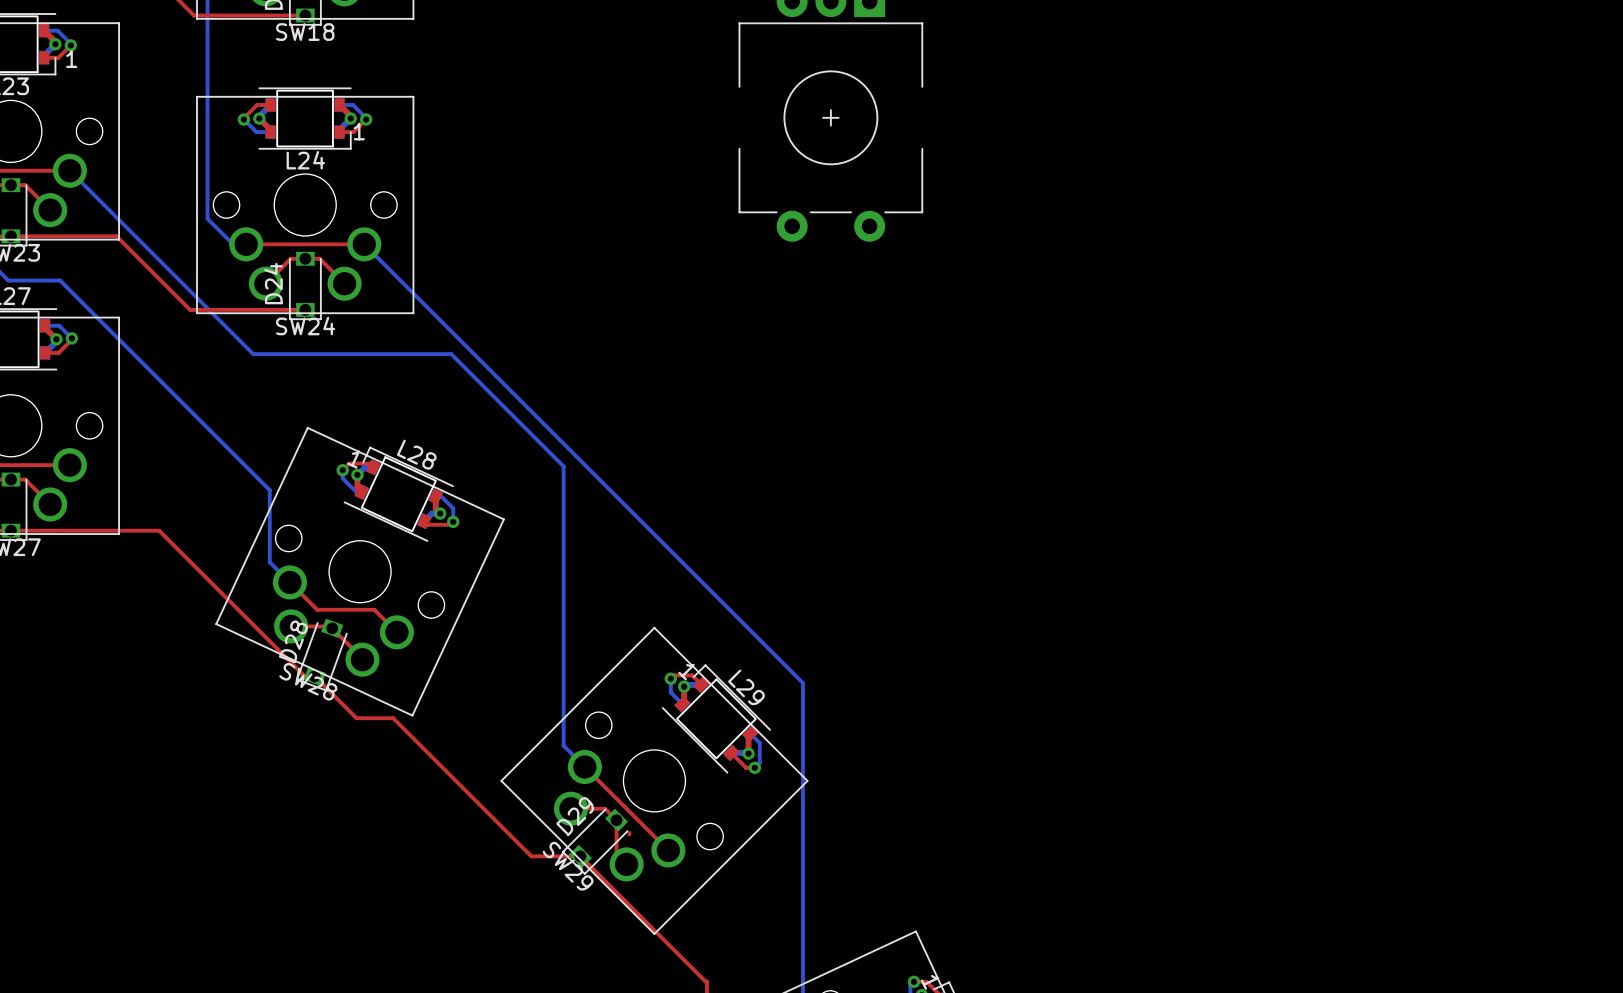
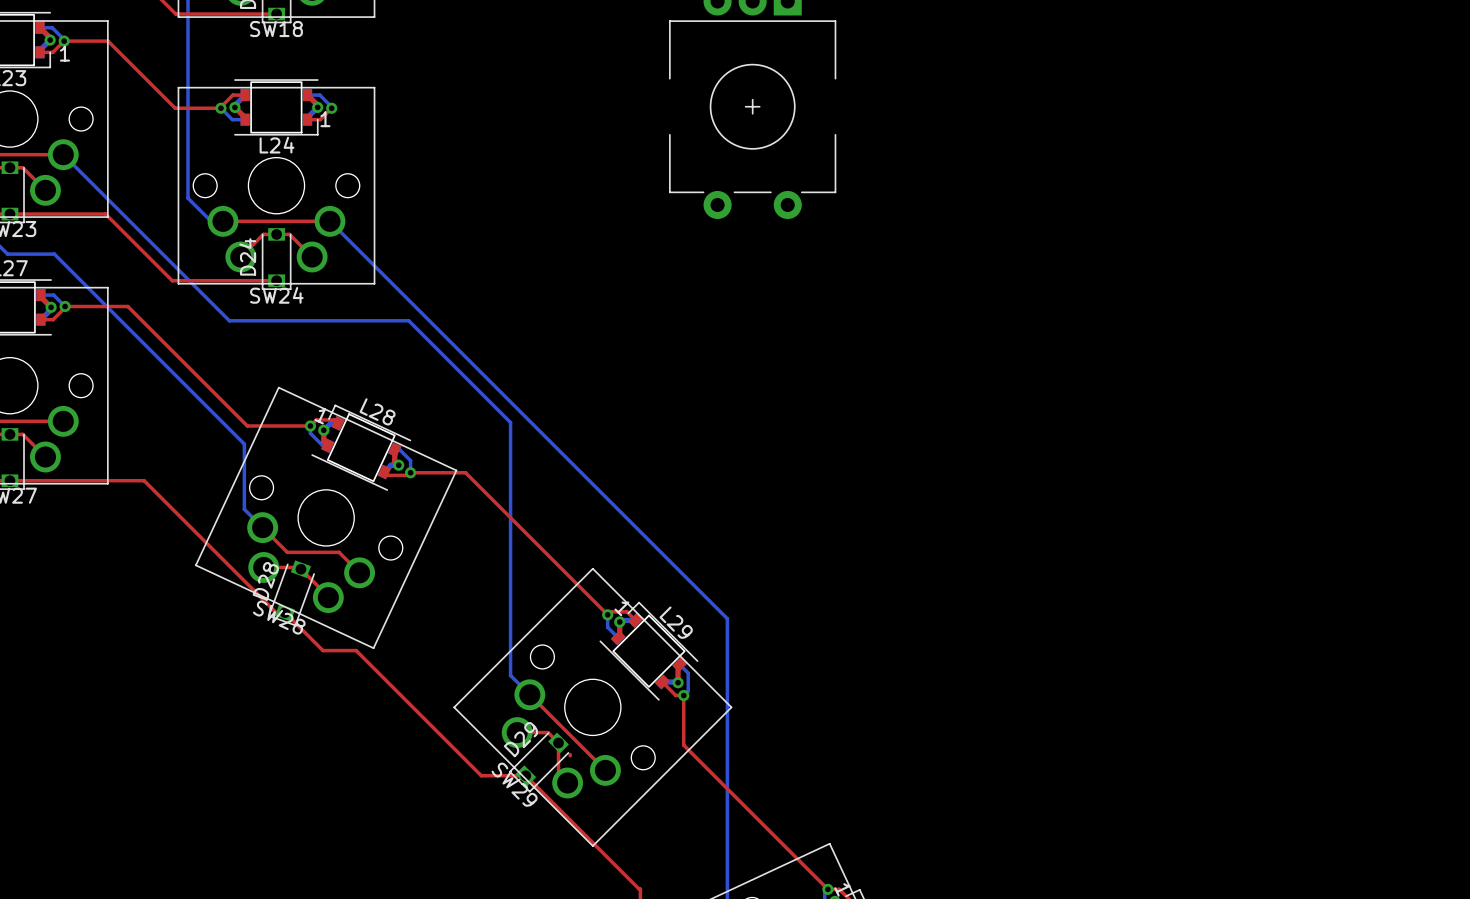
top track: none -> (64, 41) (108, 41) (175, 108) (220, 108)
top track: none -> (65, 306) (127, 306) (247, 425) (310, 425)
top track: none -> (410, 472) (465, 472) (607, 614)
top track: none -> (683, 695) (683, 745) (827, 889)

